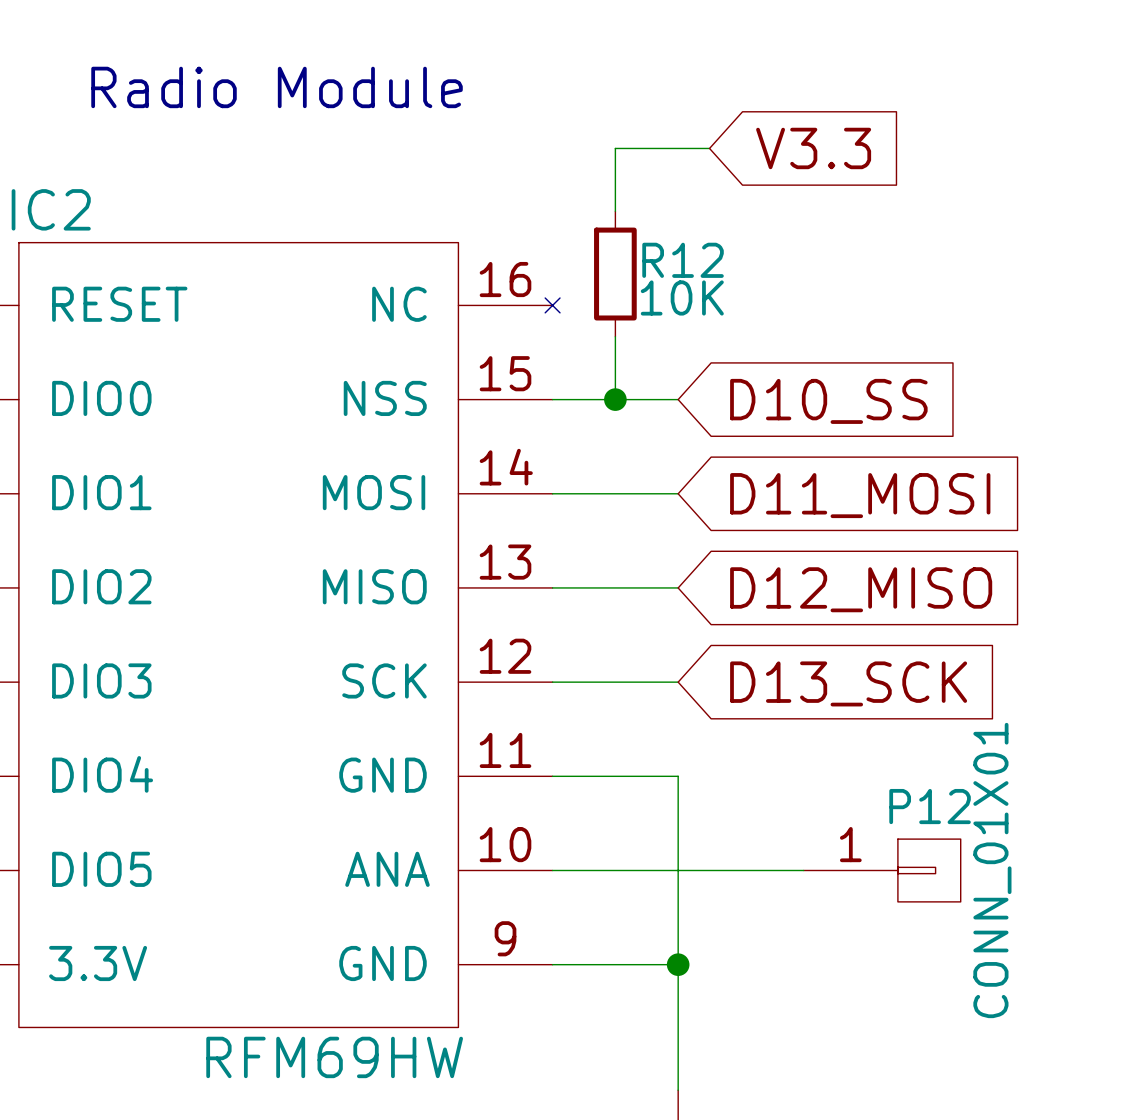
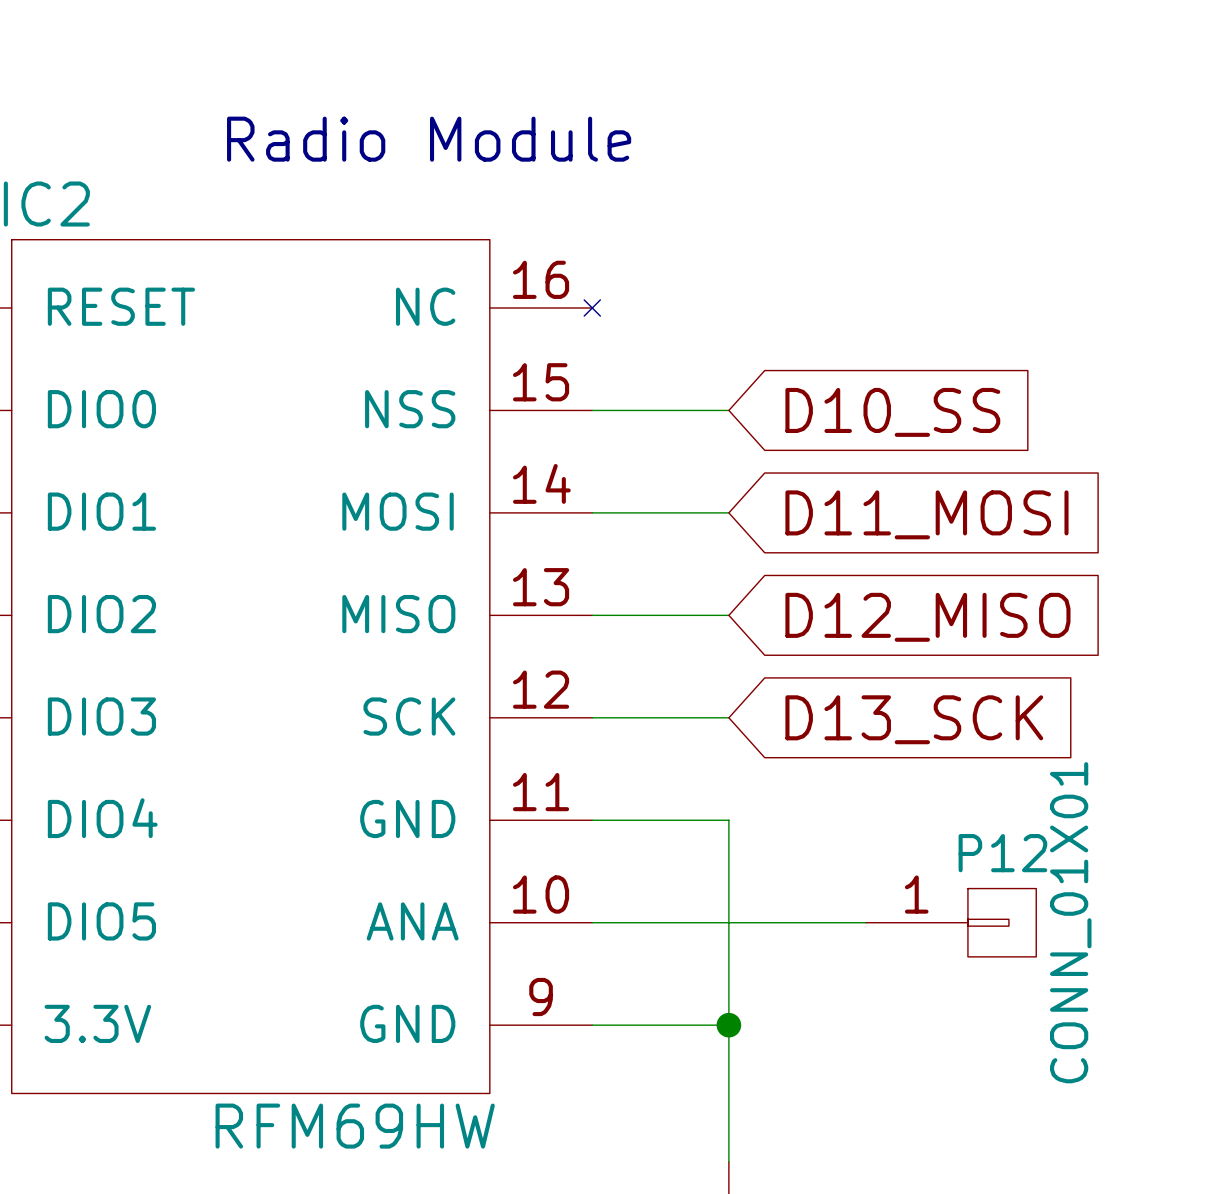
text position: Radio Module (277, 87) -> Radio Module (429, 139)
wire: (709, 148) (615, 148) (615, 211) -> none
global label: V3.3 (813, 148) -> none
R12: 10K (615, 274) -> none
wire: (615, 336) (615, 399) -> none
junction: (615, 399) -> none

